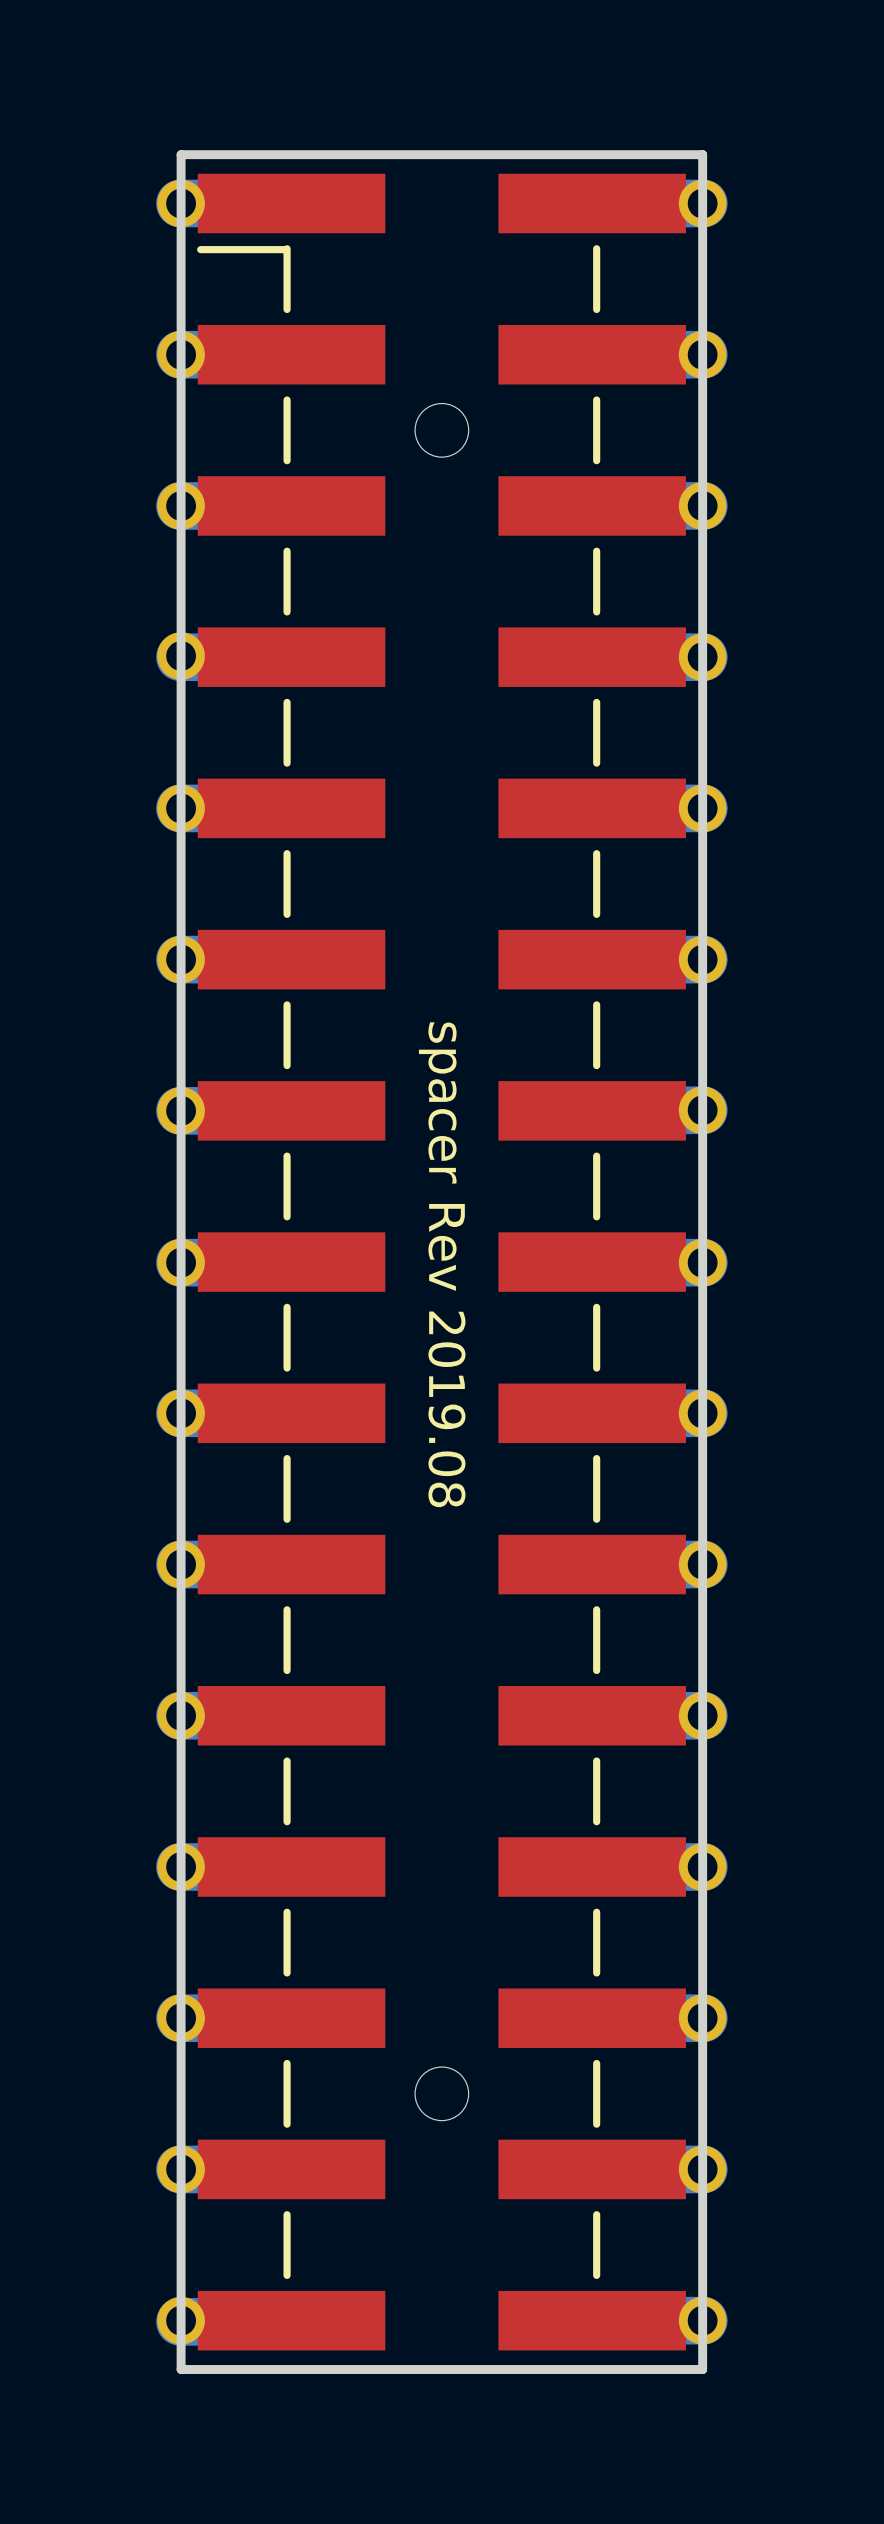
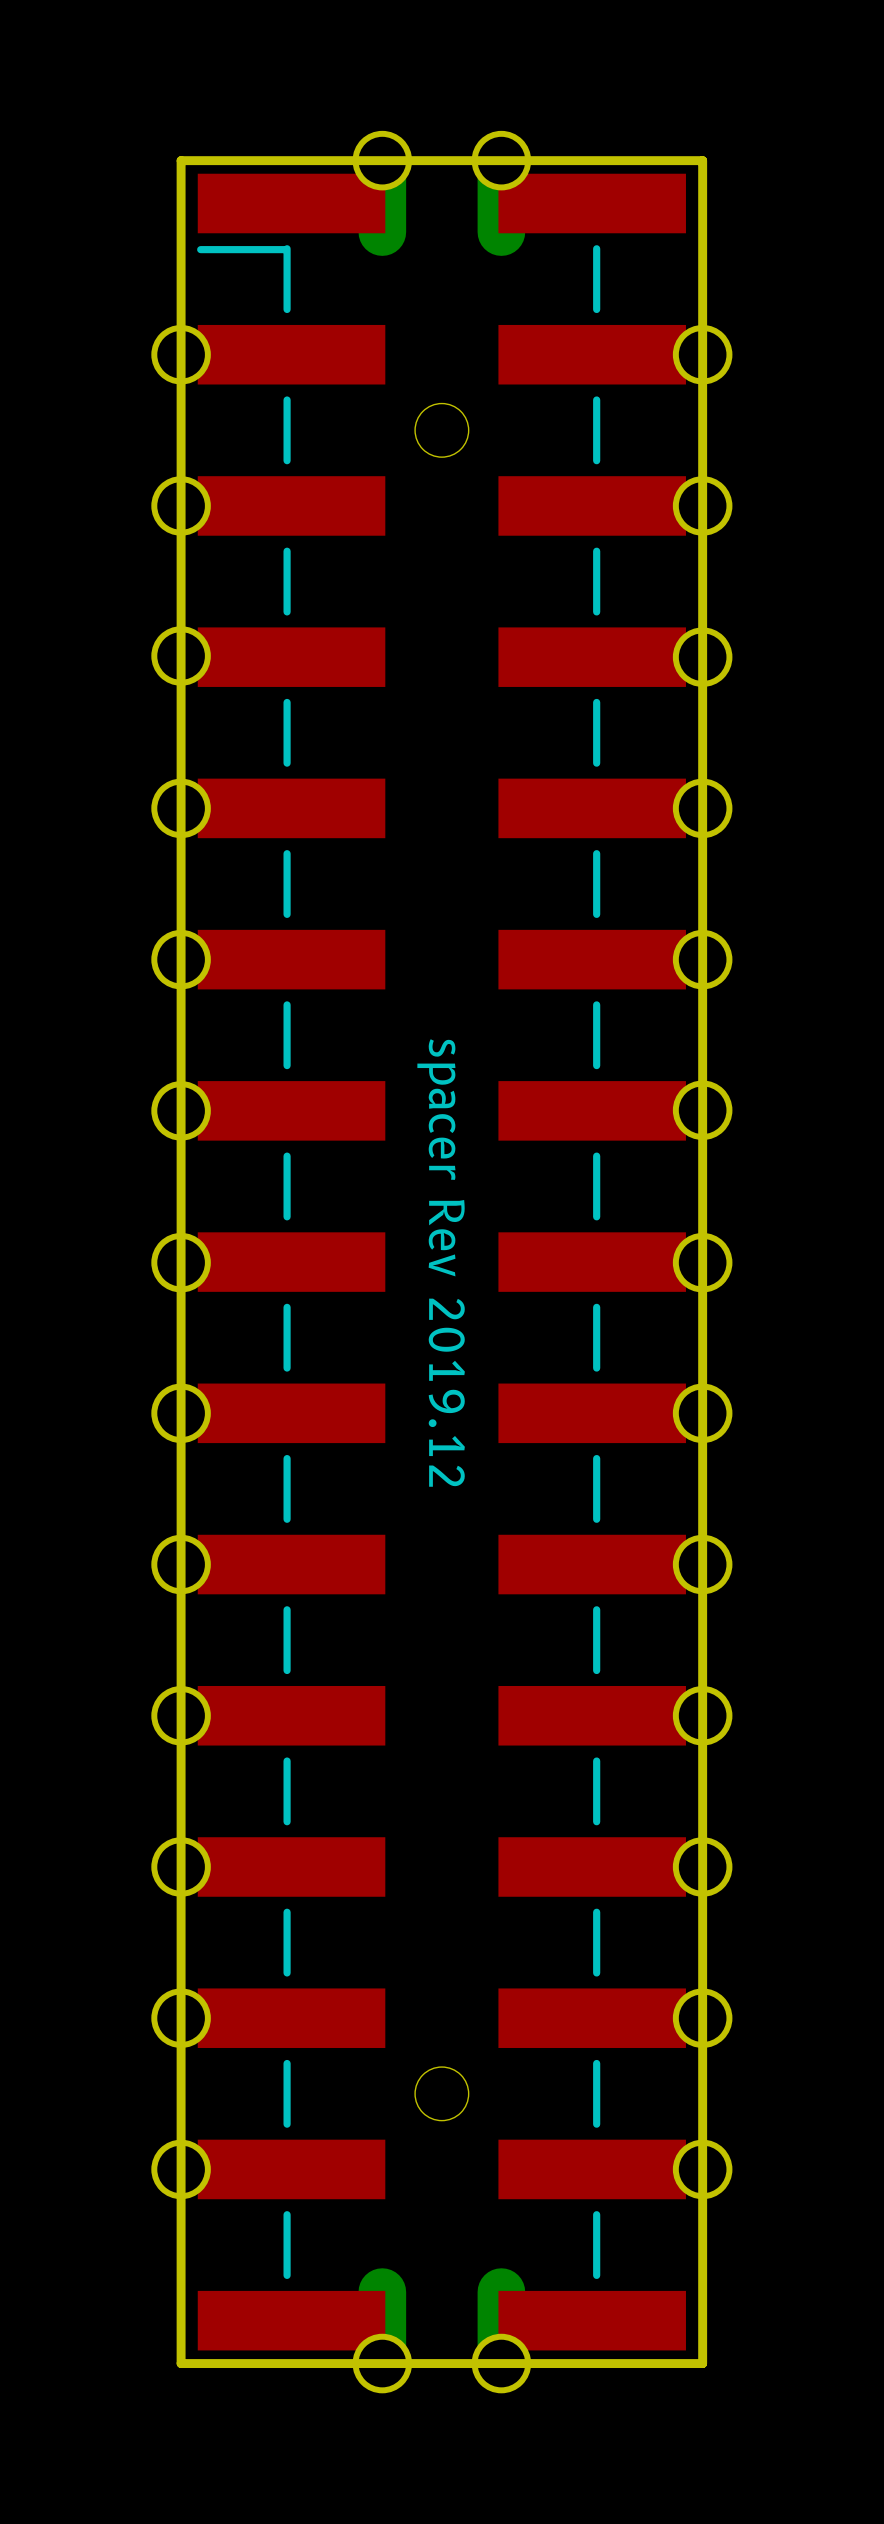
part footprint: [156, 150, 728, 2374] -> [151, 130, 733, 2394]
text: spacer Rev 2019.08 (442, 1264) -> spacer Rev 2019.12 (441, 1262)

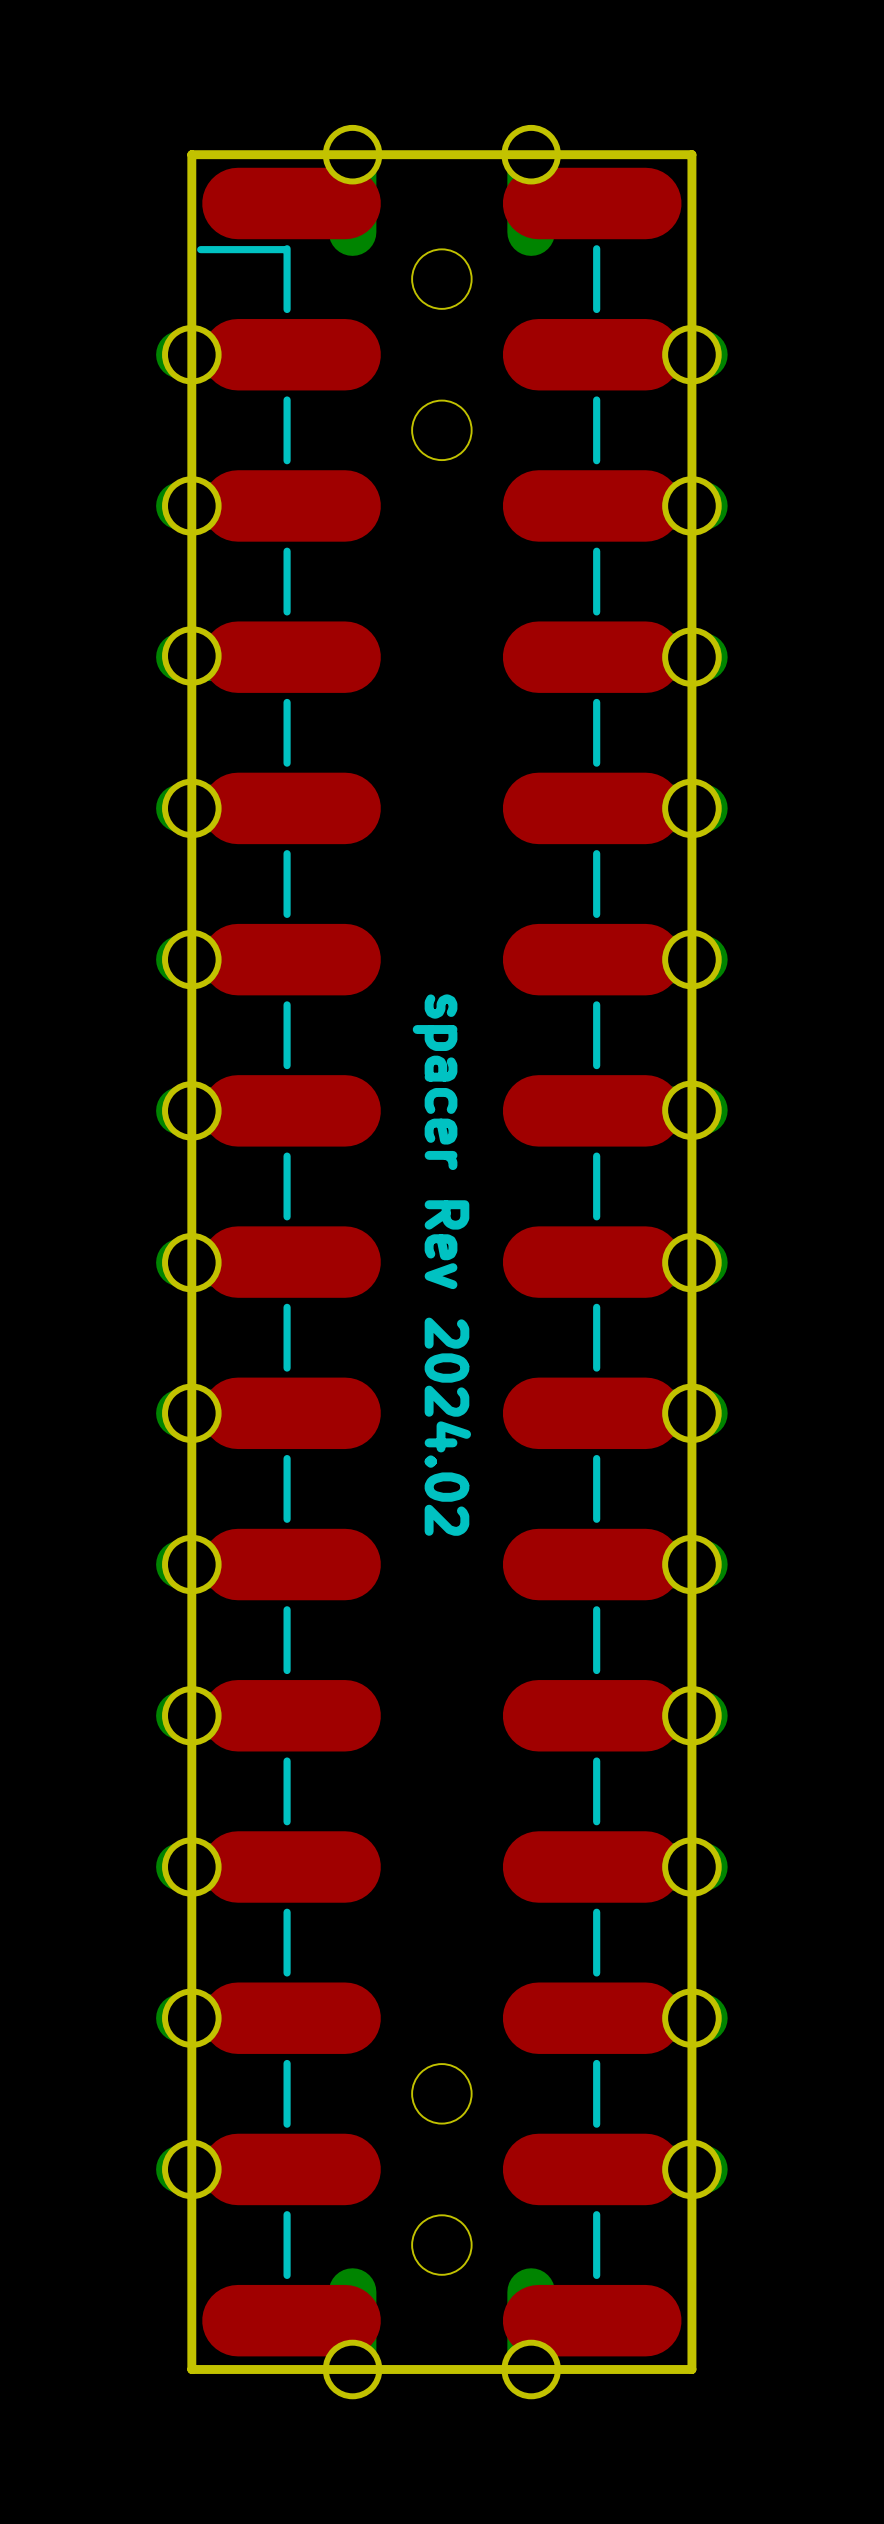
part footprint: [151, 130, 733, 2394] -> [156, 124, 728, 2400]
text: spacer Rev 2019.12 (441, 1262) -> spacer Rev 2024.02 (441, 1265)

